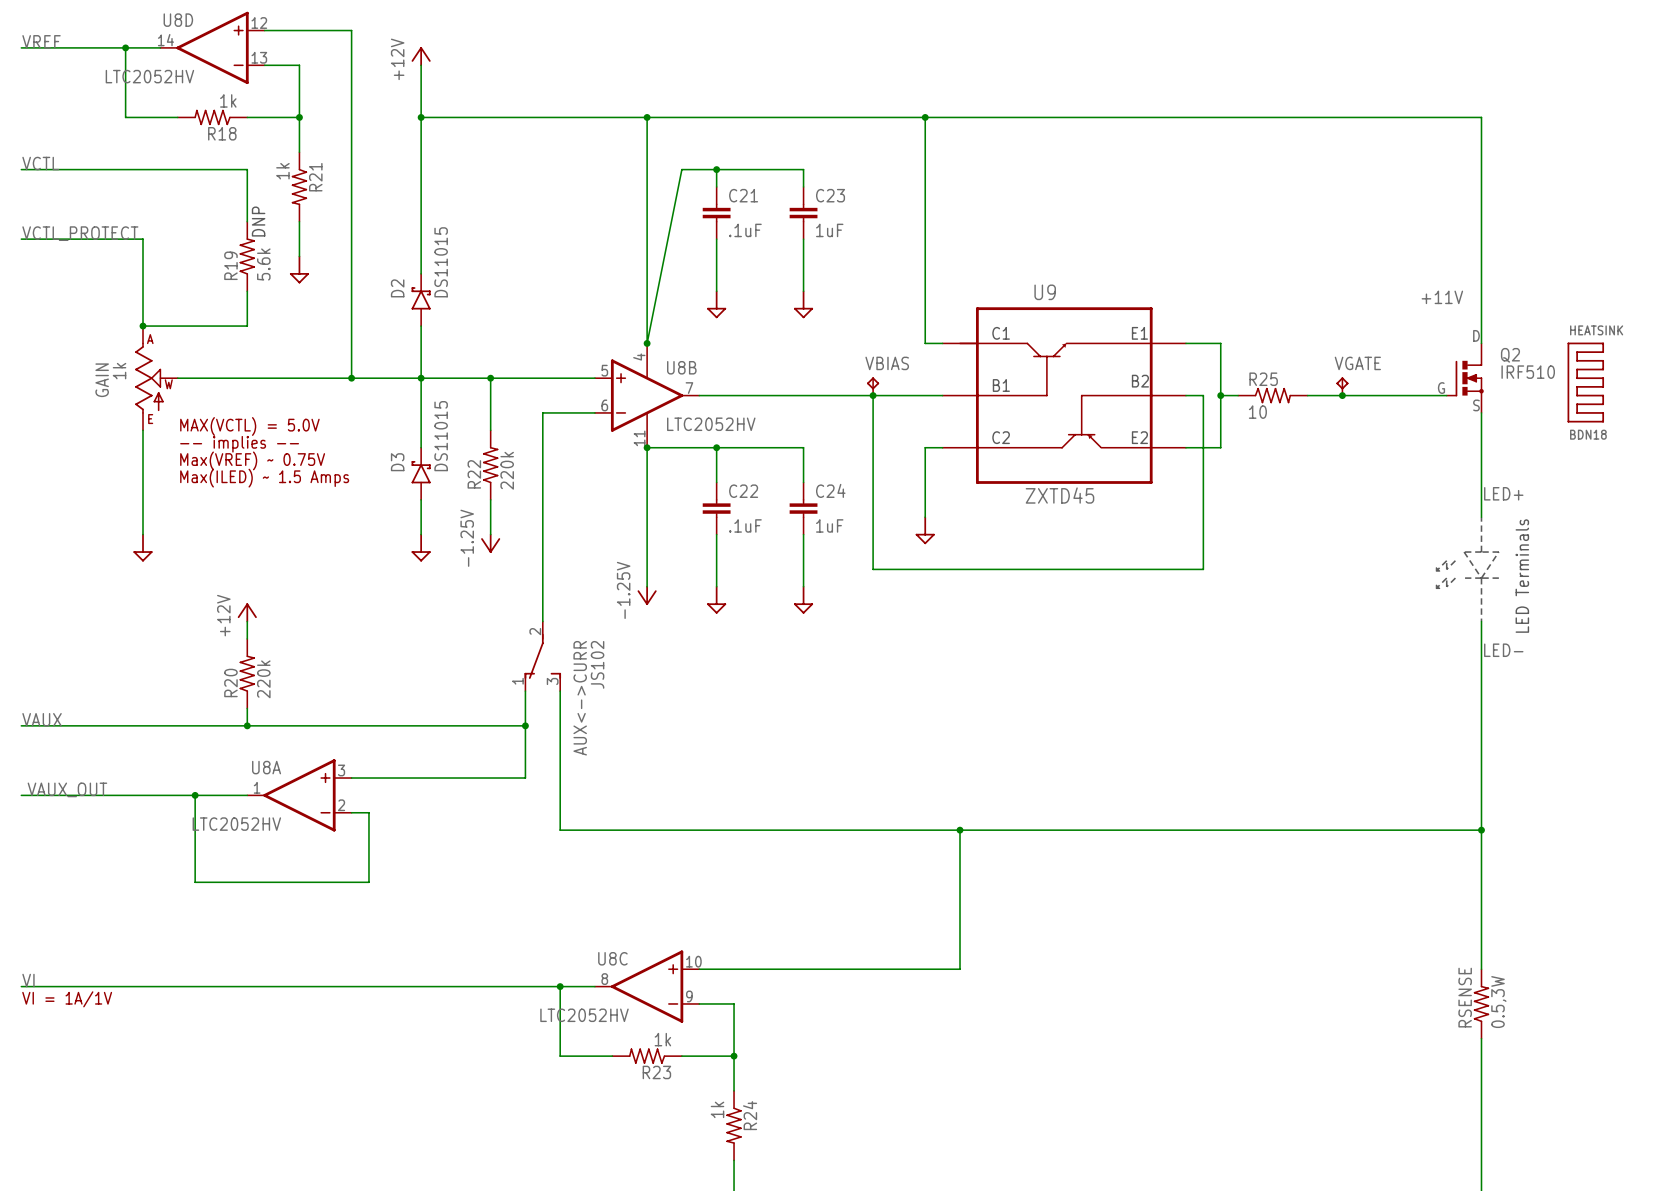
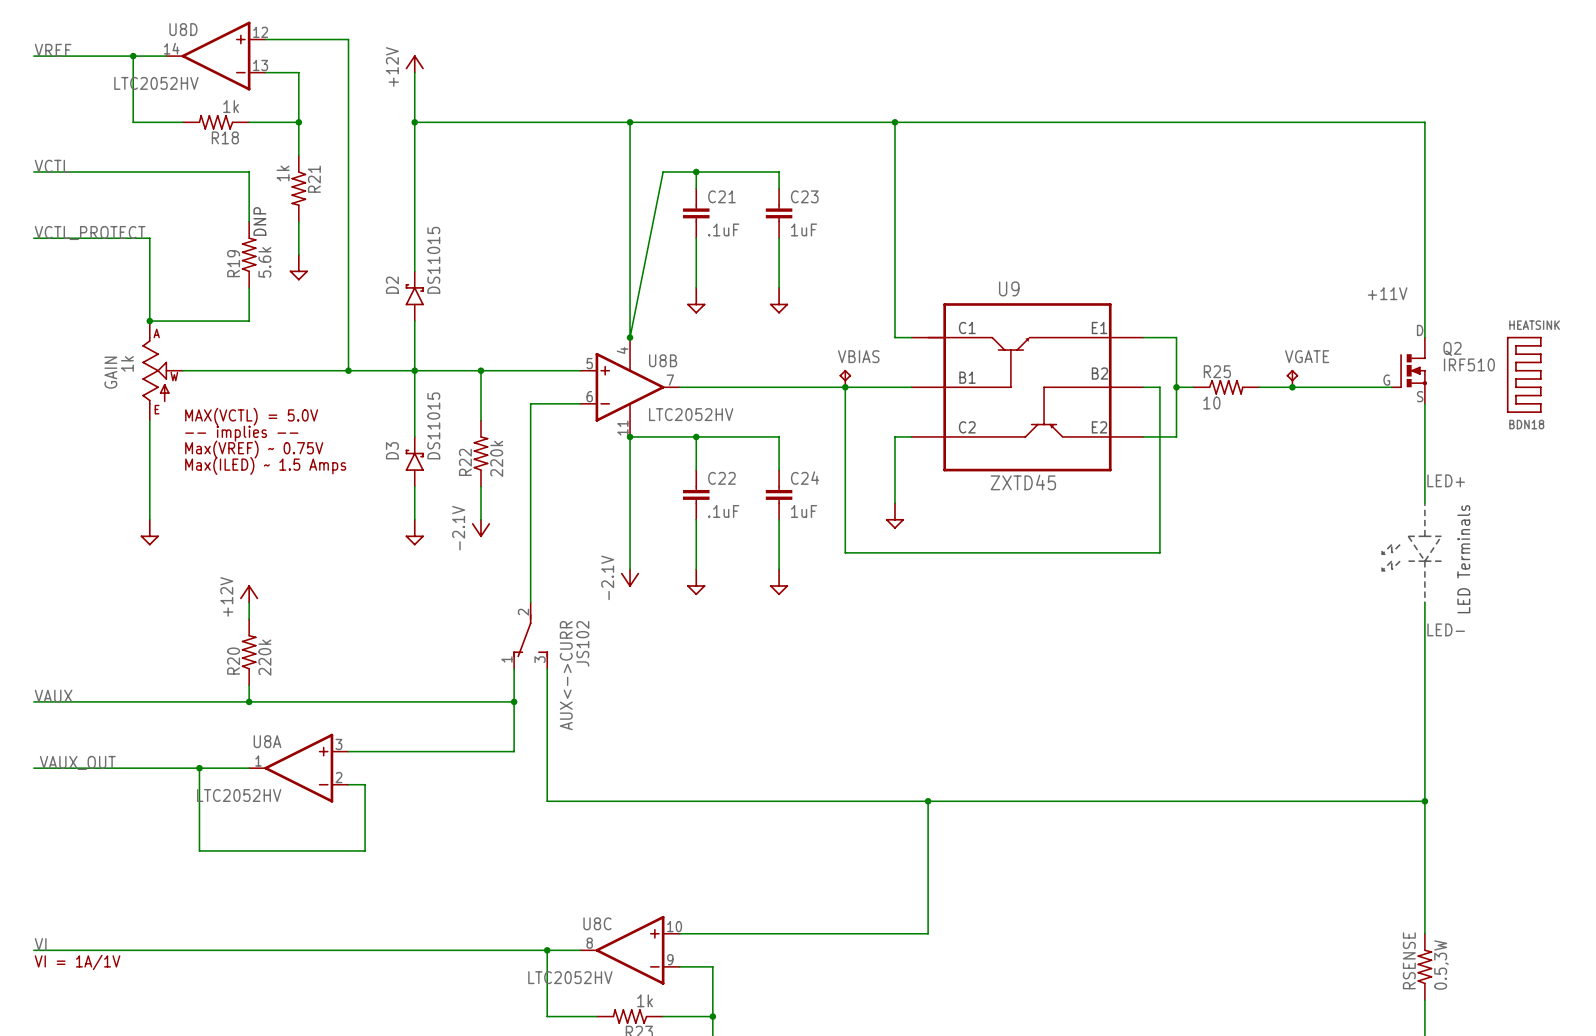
part value: -1.25V (467, 538) -> -2.1V (458, 528)
part value: -1.25V (623, 590) -> -2.1V (607, 577)

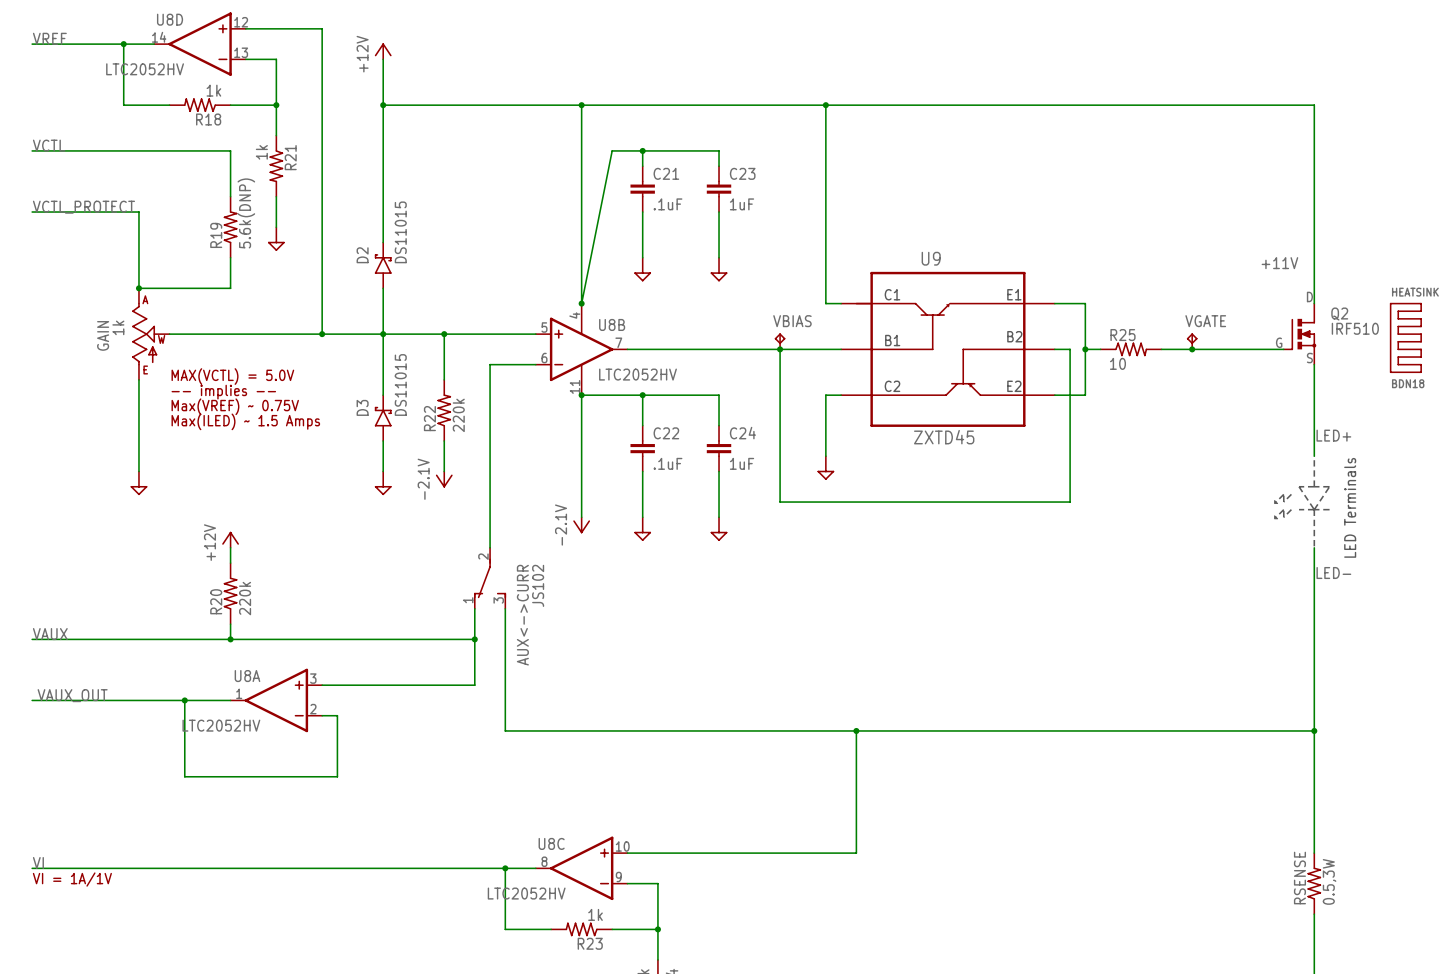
text: DNP (259, 221) -> none
R19 value: 5.6k (264, 262) -> 5.6k(DNP) (246, 213)

